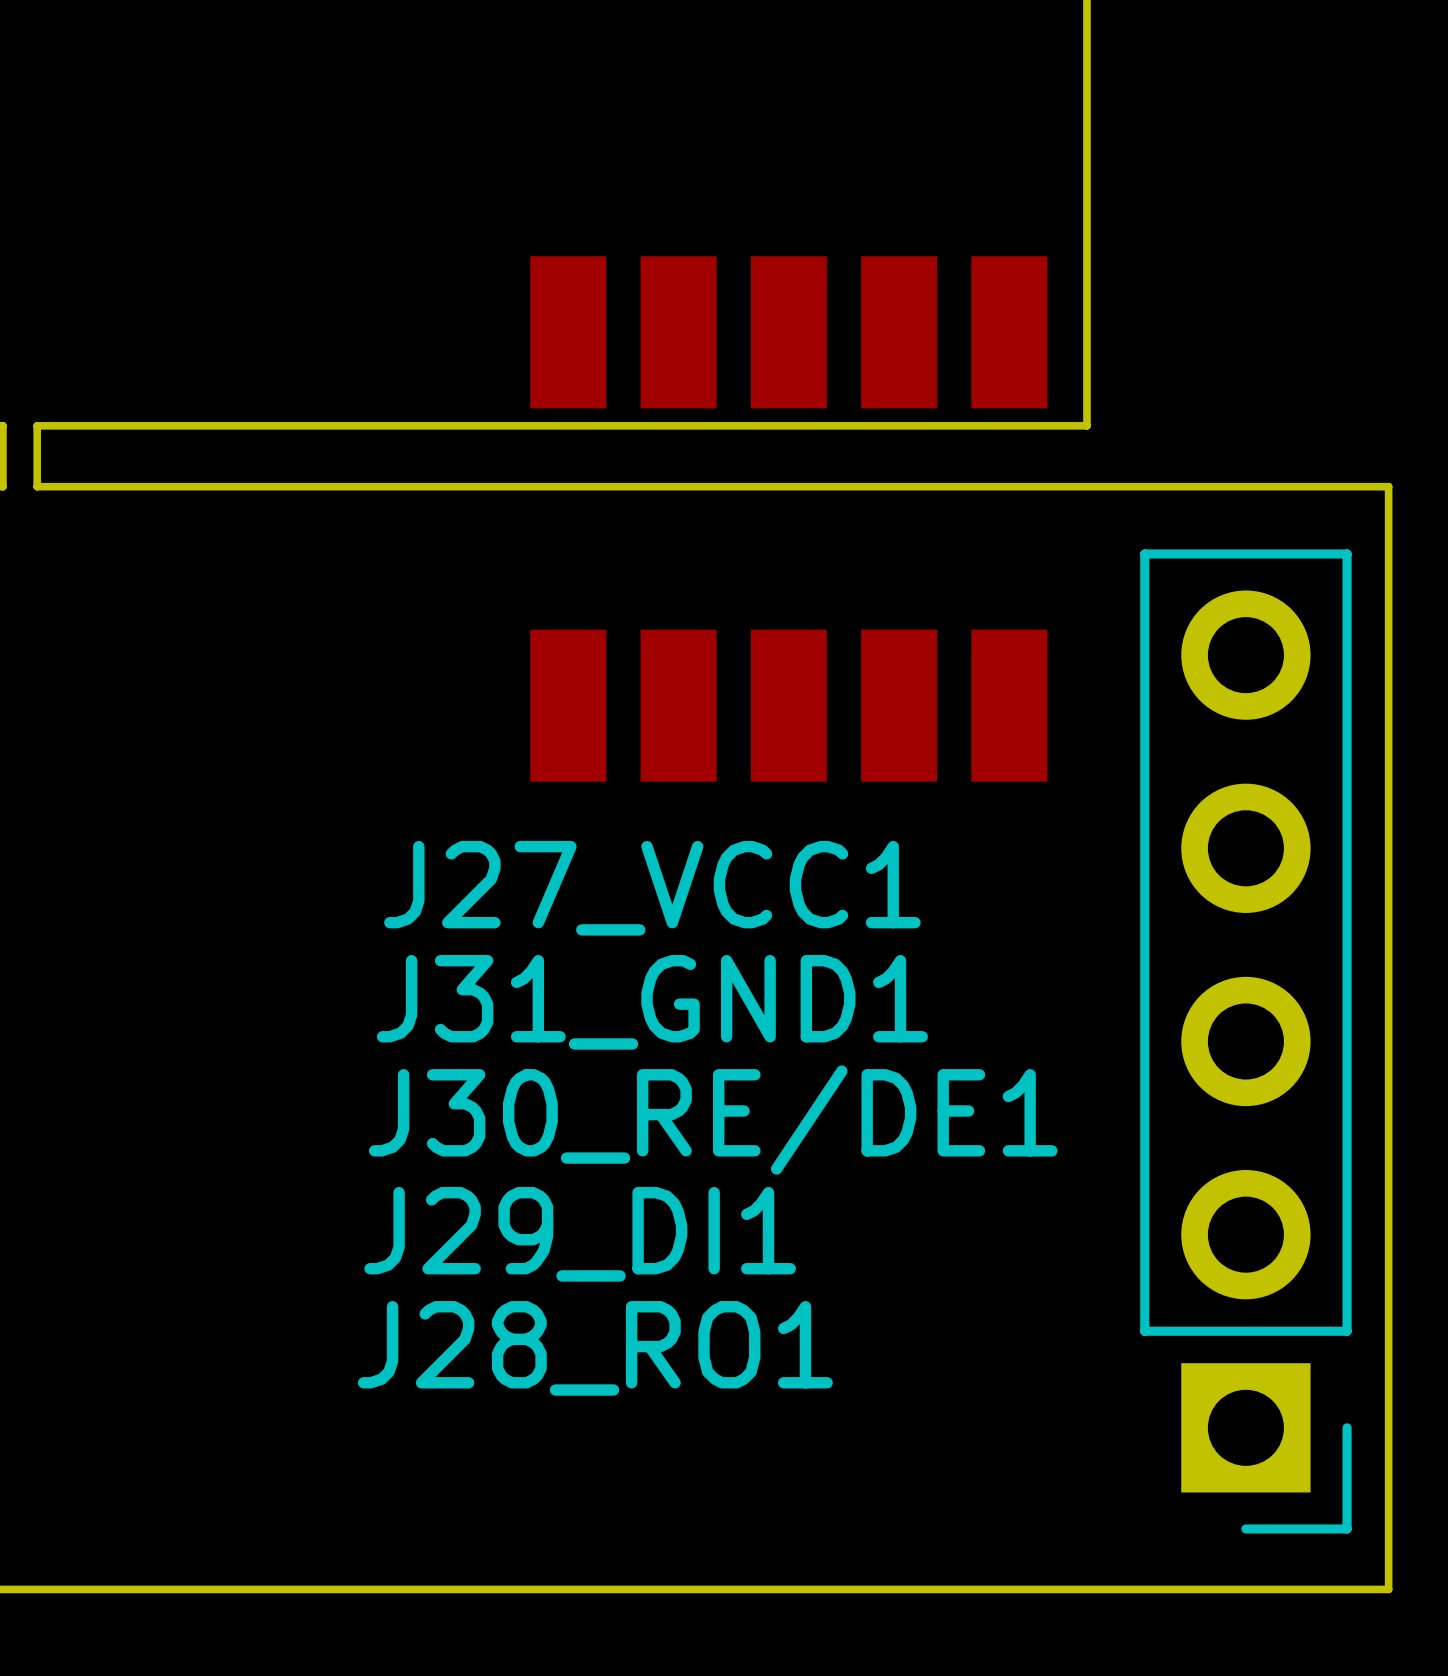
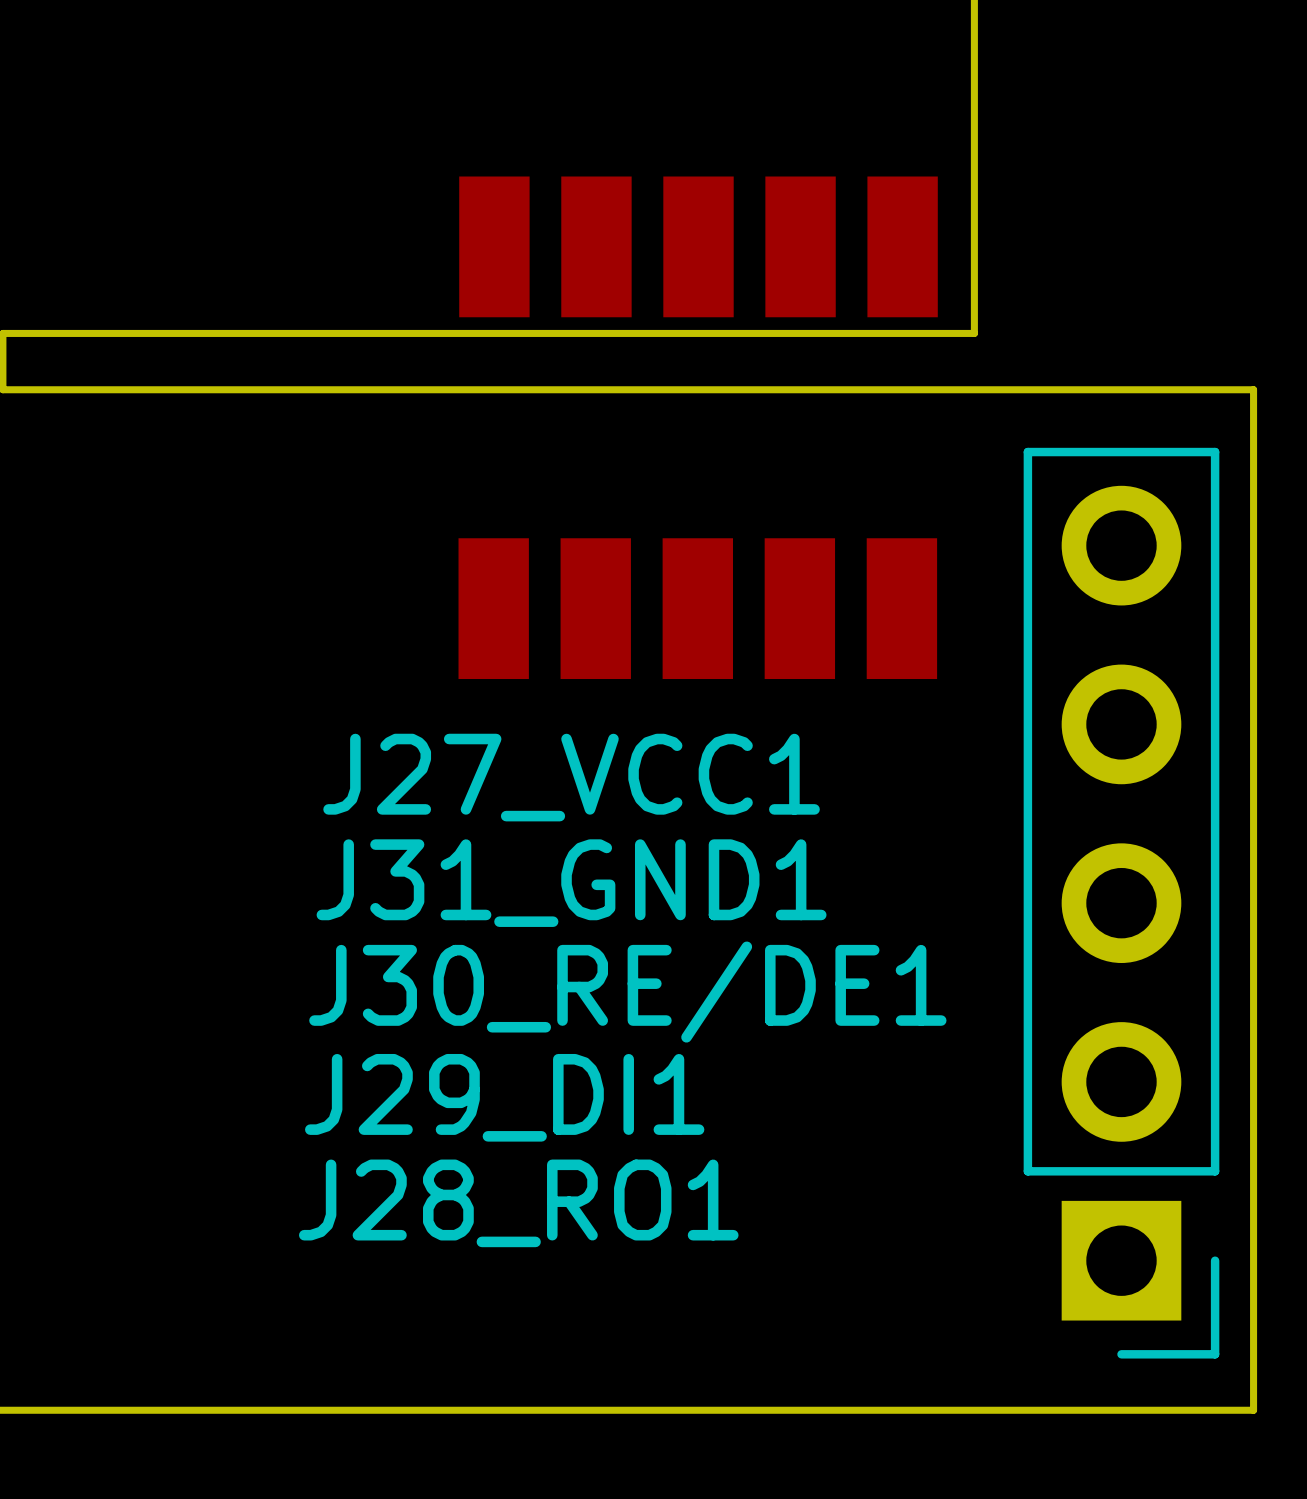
J27_VCC1 position: (568, 705) -> (493, 608)
J31_GND1 position: (678, 705) -> (595, 608)
J30_RE/DE1 position: (788, 705) -> (697, 608)
J29_DI1 position: (899, 705) -> (799, 608)
J28_RO1 position: (1009, 705) -> (901, 608)

